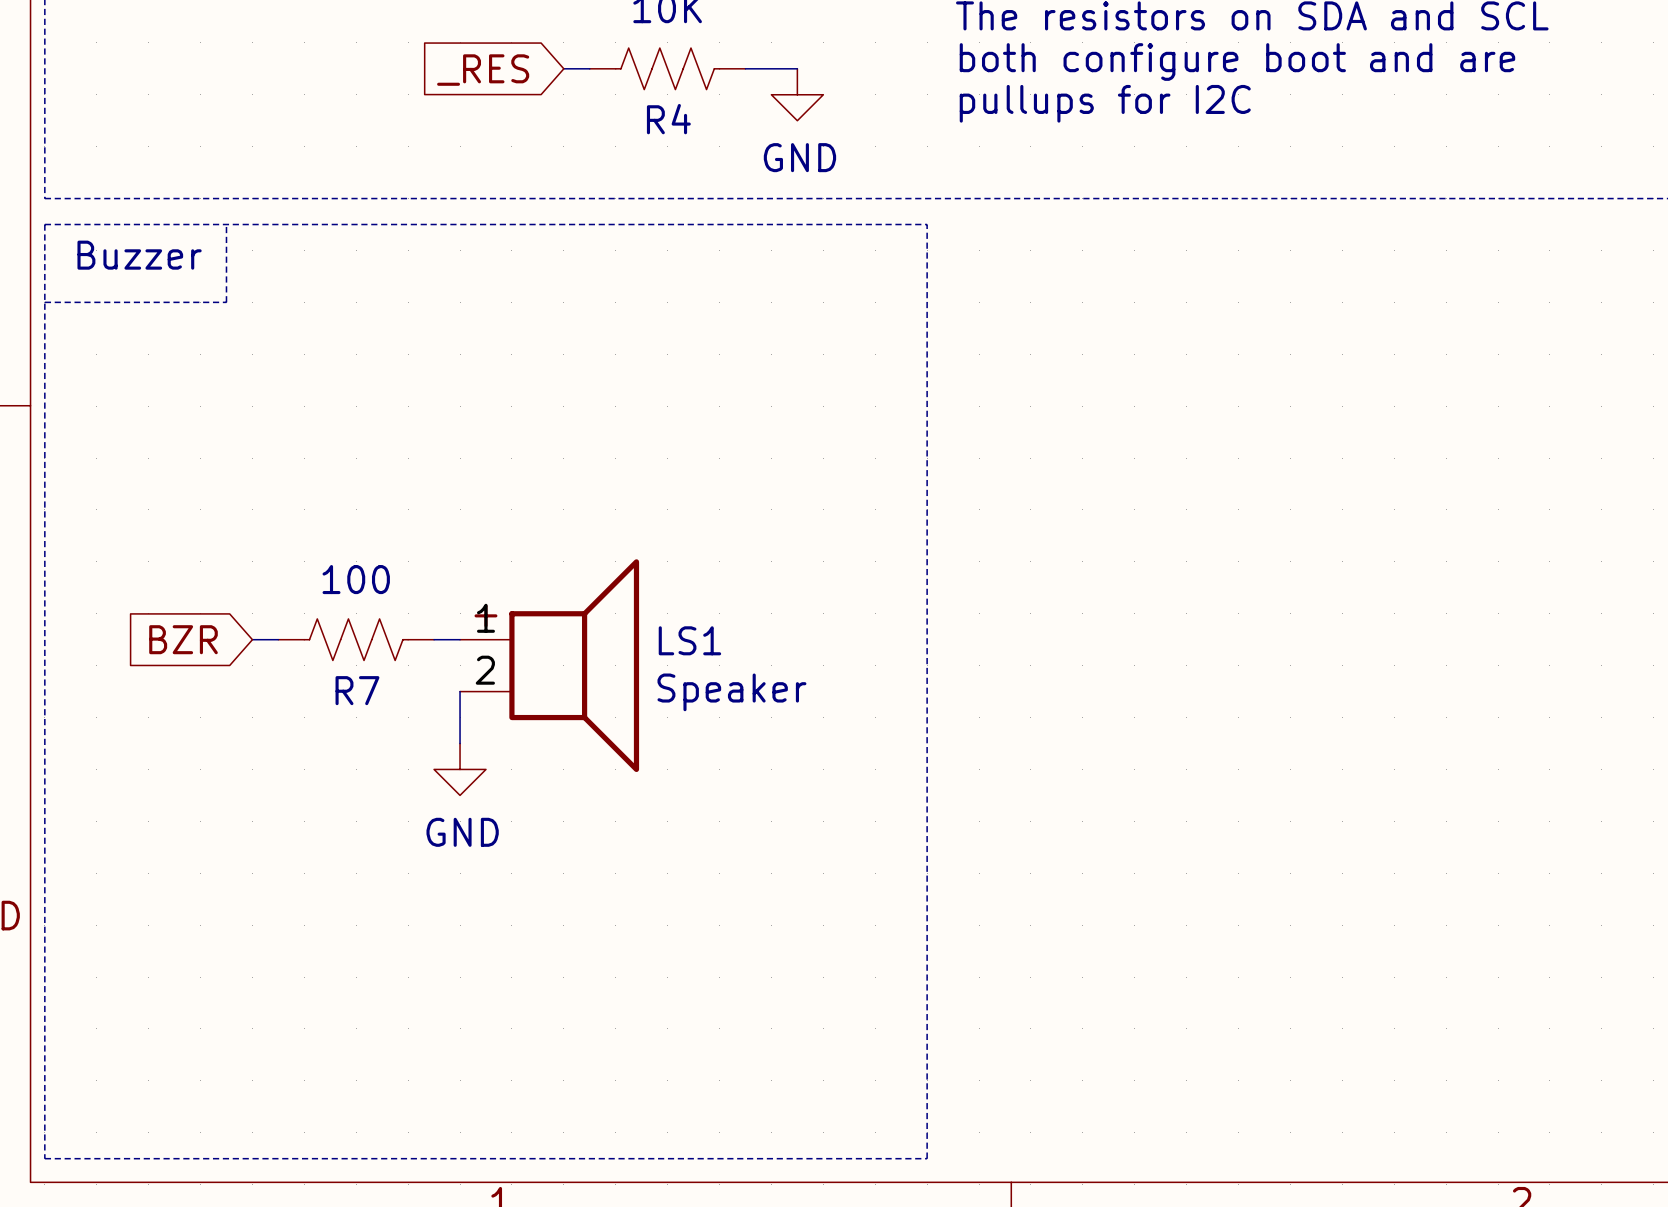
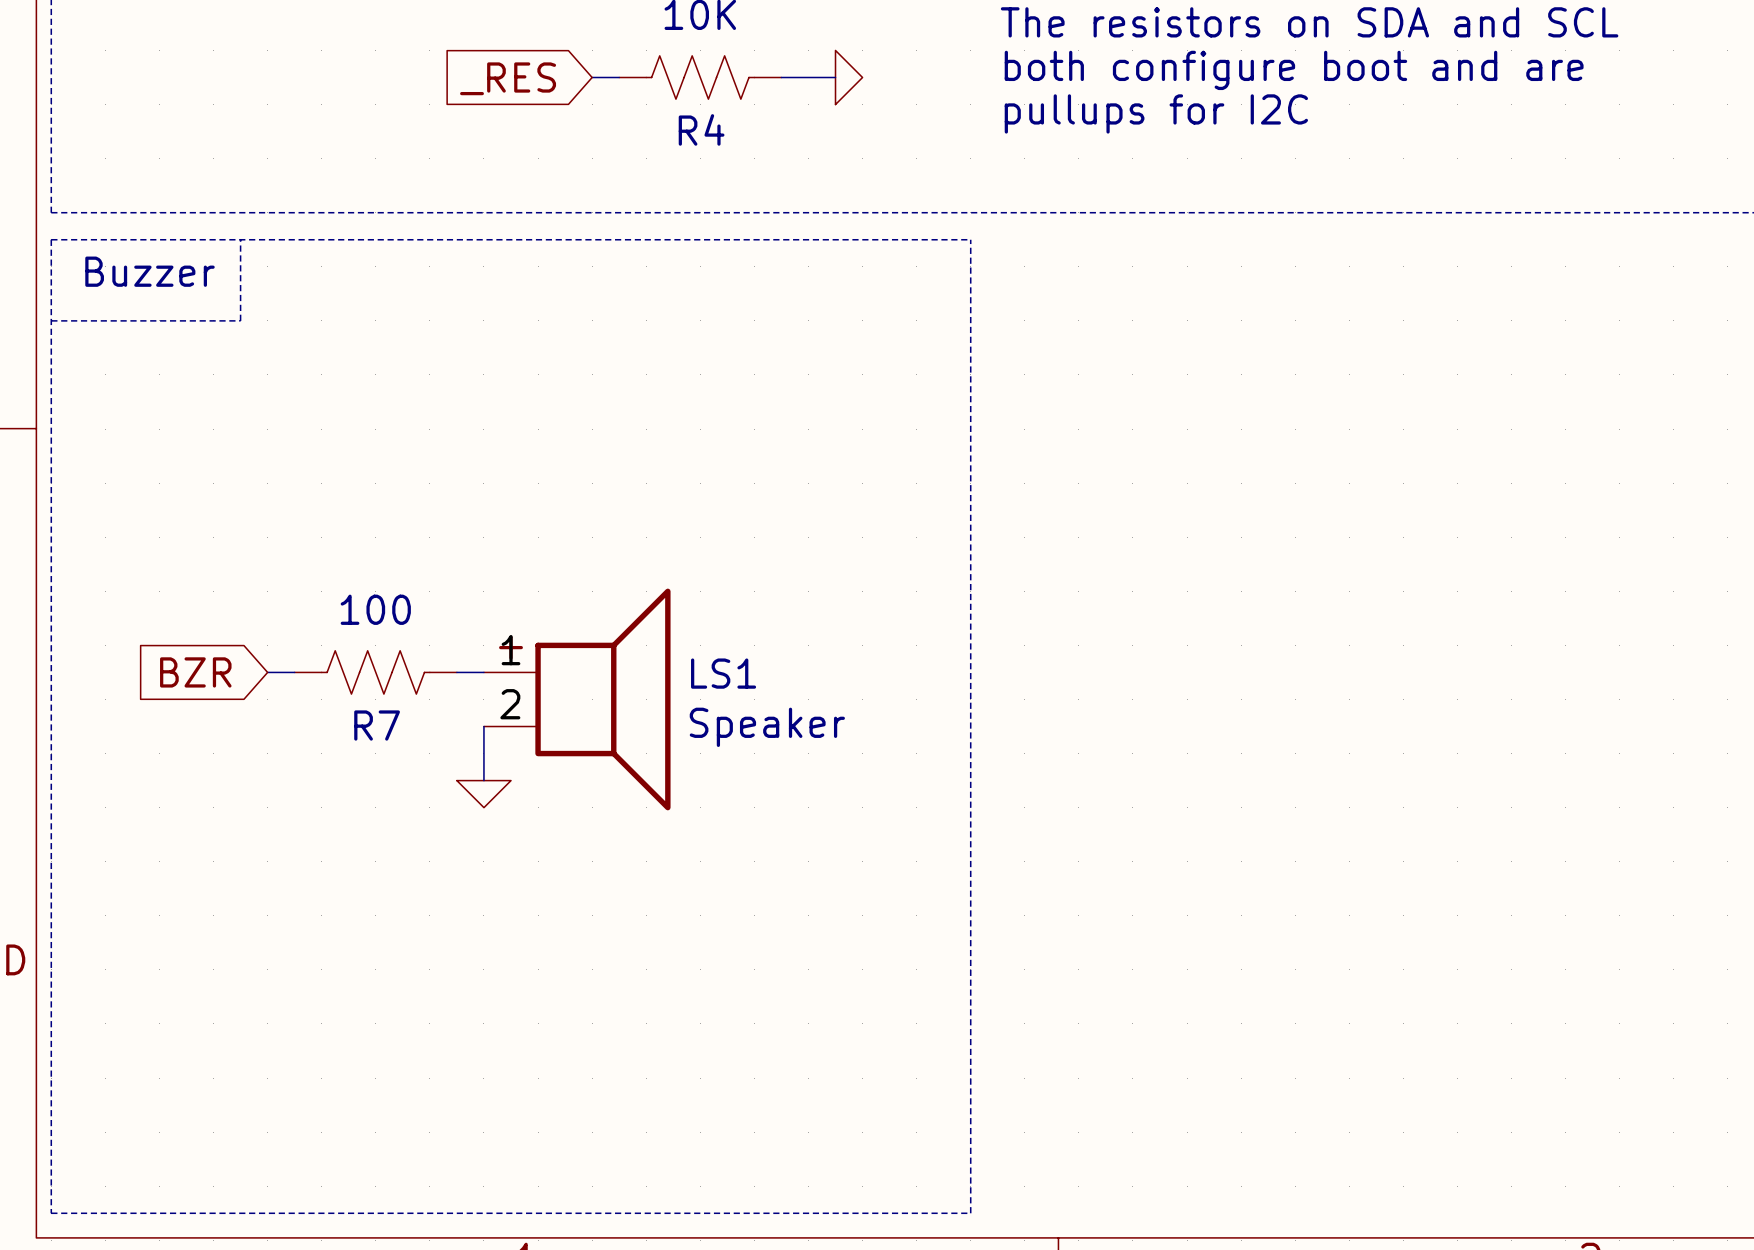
power symbol: none -> (849, 77)
power symbol: GND (797, 94) -> none
power symbol shape: [434, 743, 486, 796] -> [456, 780, 512, 808]
power symbol text: GND (462, 832) -> none

